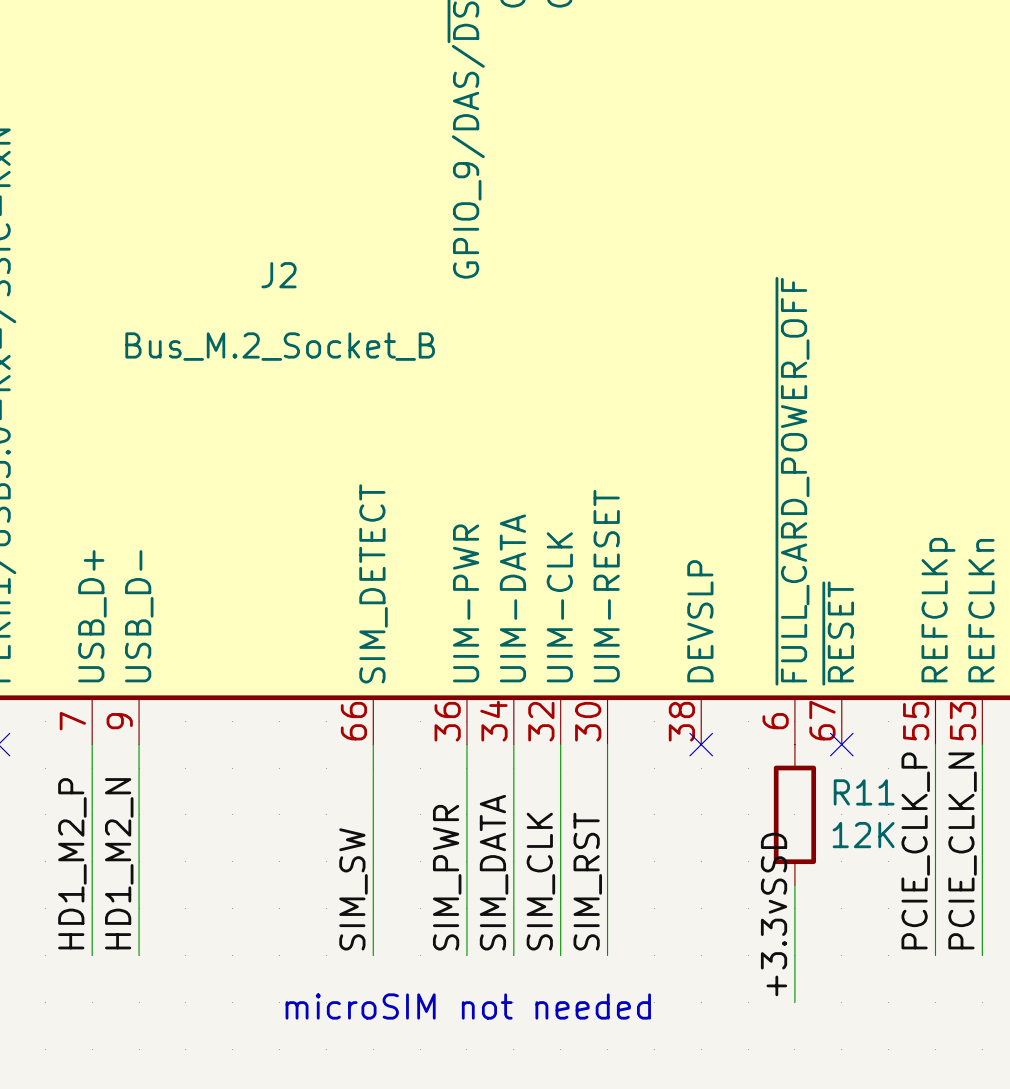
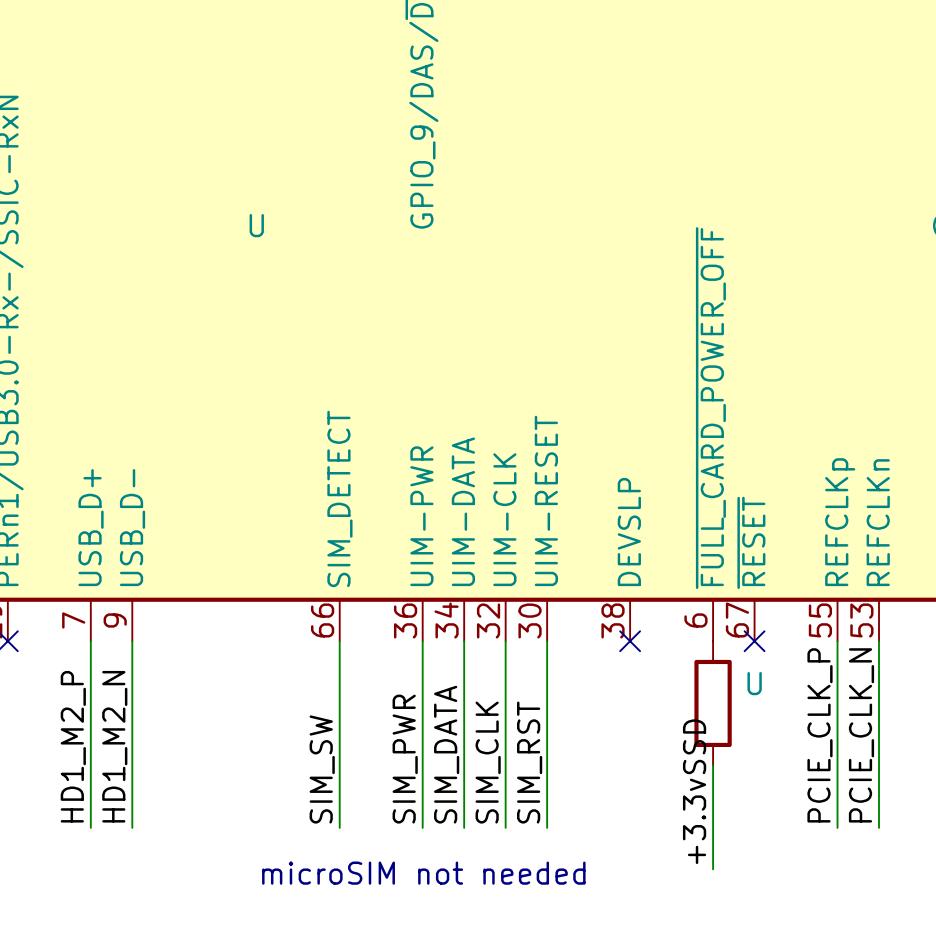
J2 name: J2 (279, 275) -> U (256, 225)
J2 value: Bus_M.2_Socket_B (280, 346) -> none
R11 name: R11 (864, 792) -> U (754, 683)
R11 value: 12K (863, 835) -> none

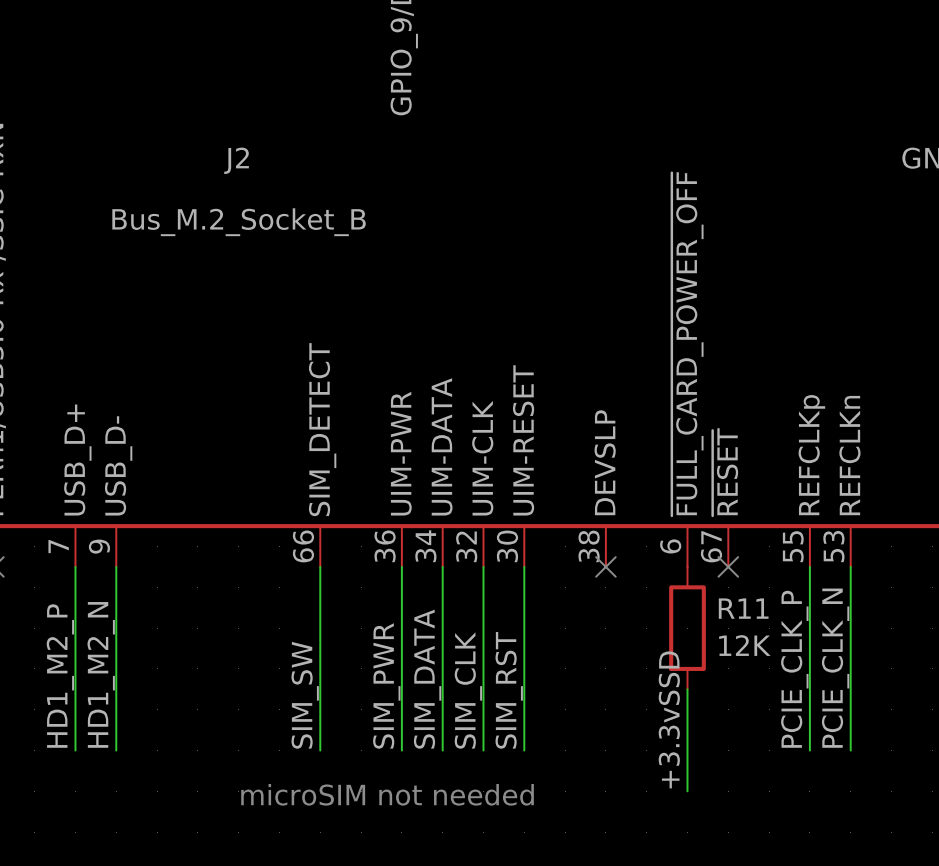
U name: U (256, 225) -> J2 (236, 160)
U value: none -> Bus_M.2_Socket_B (239, 222)
U name: U (754, 683) -> R11 (743, 608)
U value: none -> 12K (744, 645)

